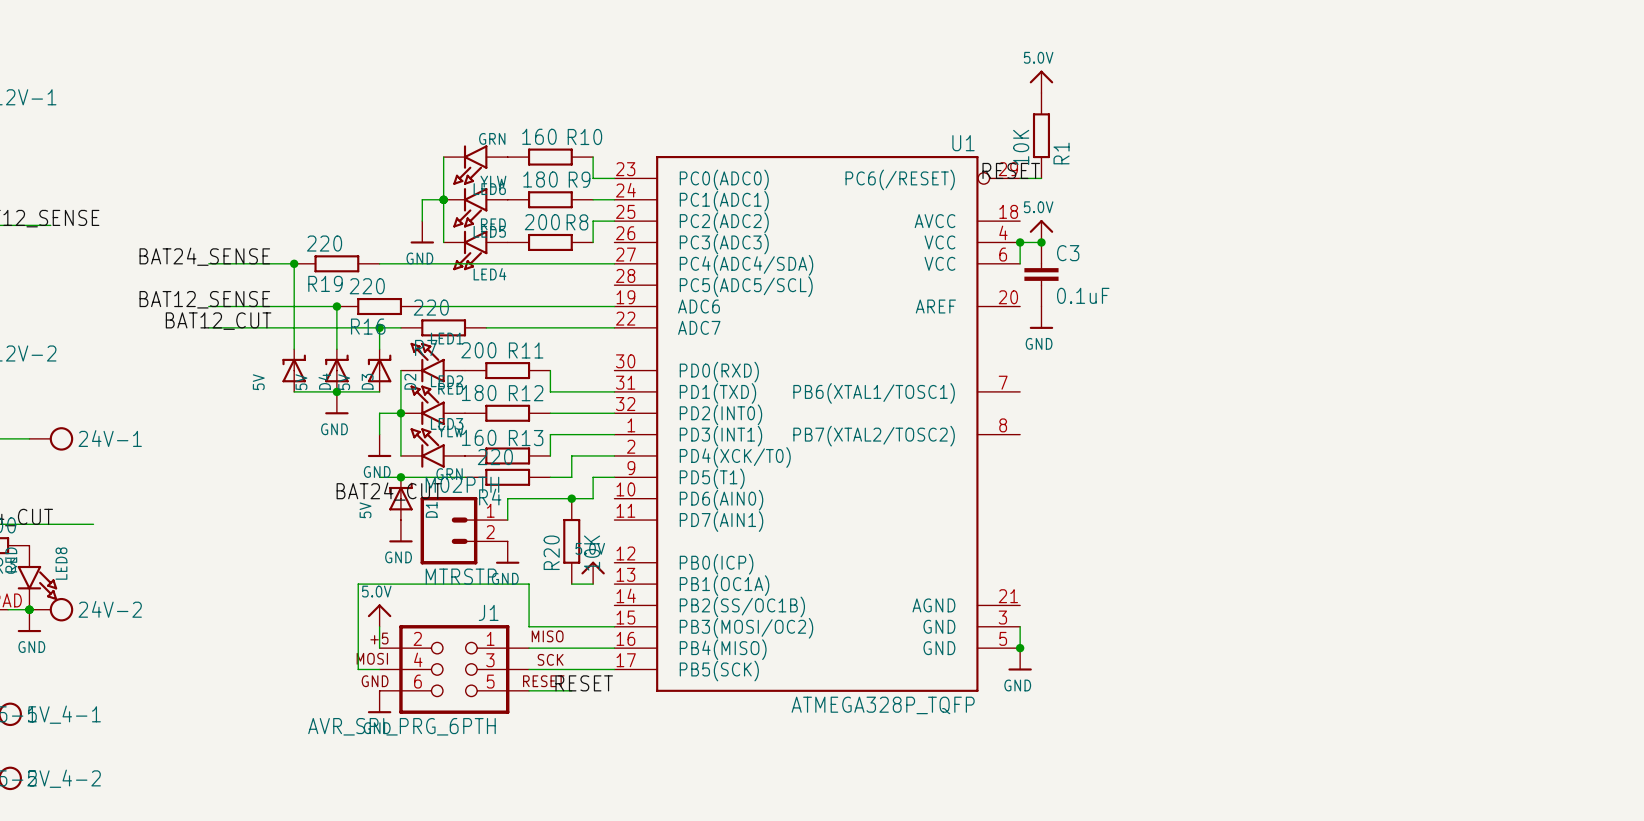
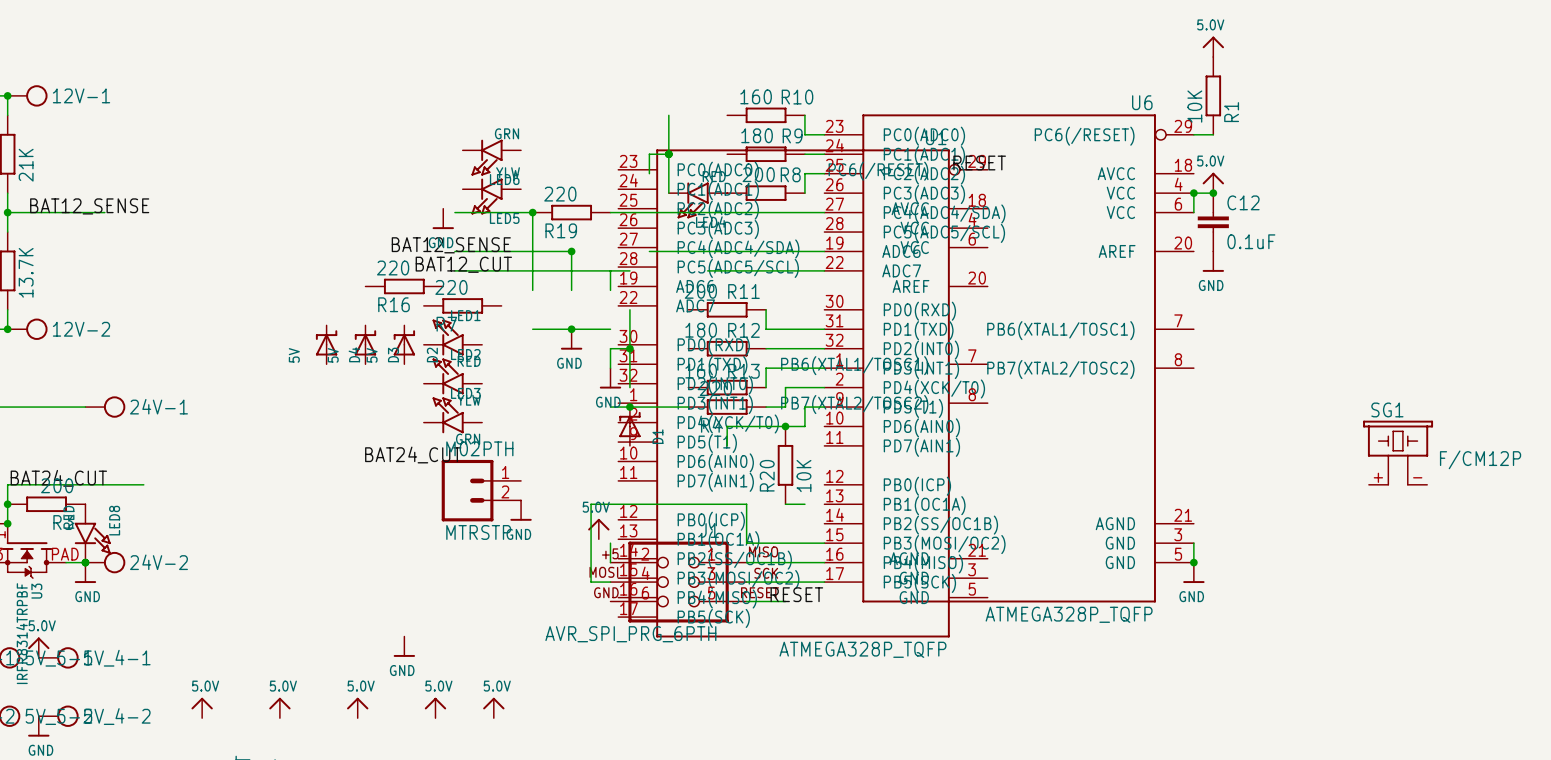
power symbol: none -> 5.0V (1213, 46)
power symbol: 5.0V (1041, 81) -> none
wire: none -> (668, 115) (668, 193)
wire: none -> (804, 115) (804, 134) (824, 134)
R1 position: (1041, 135) -> (1213, 95)
wire: none -> (1193, 134) (1213, 134)
wire: (443, 157) (443, 242) -> none
R10 position: (550, 157) -> (766, 115)
wire: (593, 157) (593, 178) (614, 178) -> none
junction: none -> (668, 154)
wire: (1020, 178) (1041, 178) -> (804, 154) (824, 154)
power symbol: none -> 5.0V (1213, 182)
wire: (443, 199) (422, 199) (422, 221) -> none
junction: (443, 199) -> none
R9 position: (550, 199) -> (766, 154)
wire: (593, 199) (614, 199) -> none
junction: none -> (1193, 193)
wire: none -> (1213, 193) (1193, 193) (1193, 212)
junction: none -> (1213, 193)
wire: (614, 221) (593, 221) (593, 242) -> (668, 154) (649, 154) (649, 173)
wire: none -> (454, 212) (532, 212) (532, 290)
junction: none -> (532, 212)
wire: none -> (610, 212) (824, 212)
power symbol: 5.0V (1041, 231) -> none
C12: none -> 0.1uF (1213, 222)
R8 position: (550, 242) -> (766, 193)
junction: (1020, 242) -> none
wire: (1041, 242) (1020, 242) (1020, 263) -> (824, 173) (804, 173) (804, 193)
junction: (1041, 242) -> none
LED4 position: (475, 250) -> (698, 200)
label: BAT24_SENSE (204, 256) -> none
label: none -> BAT12_SENSE (451, 245)
wire: (208, 263) (294, 263) (294, 349) -> none
junction: (294, 263) -> none
R19 position: (336, 263) -> (571, 212)
wire: (379, 263) (614, 263) -> none
wire: none -> (454, 251) (571, 251) (571, 290)
junction: none -> (571, 251)
wire: none -> (649, 251) (824, 251)
C3: 0.1uF (1041, 274) -> none
power symbol: none -> GND (1213, 261)
label: none -> BAT12_CUT (463, 264)
wire: none -> (610, 270) (610, 290)
wire: none -> (707, 270) (824, 270)
label: BAT12_SENSE (204, 299) -> none
wire: (208, 306) (336, 306) (336, 349) -> none
junction: (336, 306) -> none
wire: (422, 306) (614, 306) -> (454, 270) (629, 270)
power symbol: GND (1041, 317) -> none
label: BAT12_CUT (218, 321) -> none
wire: (208, 327) (400, 327) -> none
wire: (379, 327) (379, 349) -> none
junction: (379, 327) -> none
wire: (486, 327) (614, 327) -> none
wire: none -> (629, 309) (629, 387)
wire: none -> (766, 309) (766, 329) (824, 329)
junction: none -> (571, 329)
power symbol: none -> GND (571, 339)
wire: (400, 370) (400, 455) -> none
R11 position: (507, 370) -> (727, 309)
wire: (550, 370) (550, 391) (614, 391) -> none
wire: none -> (629, 348) (610, 348) (610, 368)
junction: none -> (629, 348)
wire: none -> (766, 348) (824, 348)
U6: none -> ATMEGA328P_TQFP (1009, 358)
wire: (294, 391) (379, 391) -> none
junction: (336, 391) -> none
wire: none -> (824, 368) (766, 368) (766, 387)
power symbol: GND (336, 403) -> none
power symbol: none -> GND (610, 378)
wire: (400, 413) (379, 413) (379, 434) -> none
junction: (400, 413) -> none
R12 position: (507, 413) -> (727, 348)
wire: (550, 413) (614, 413) -> none
wire: none -> (824, 387) (785, 387) (785, 407) (766, 407)
wire: (614, 434) (550, 434) (550, 455) -> none
wire: none -> (610, 407) (688, 407)
junction: none -> (629, 407)
wire: none -> (824, 407) (804, 407) (804, 426) (727, 426) (727, 445)
power symbol: GND (379, 445) -> none
R13 position: (507, 455) -> (727, 387)
wire: (614, 455) (571, 455) (571, 477) (550, 477) -> none
junction: none -> (785, 426)
wire: (379, 477) (465, 477) -> (532, 329) (610, 329)
junction: (400, 477) -> none
R4 position: (507, 477) -> (727, 407)
wire: (614, 477) (593, 477) (593, 498) (507, 498) (507, 520) -> none
SG1: none -> F/CM12P (1398, 453)
D1 position: (400, 498) -> (629, 426)
junction: (571, 498) -> none
D1 value: 5V (365, 510) -> none
power symbol: GND (400, 531) -> none
R20 position: (571, 541) -> (785, 465)
wire: none -> (785, 504) (804, 504)
wire: (571, 584) (593, 584) -> none
wire: none -> (610, 543) (610, 562)
wire: none -> (824, 543) (746, 543) (746, 504) (591, 504) (591, 582) (610, 582)
wire: none -> (1193, 543) (1193, 562)
wire: none -> (746, 562) (824, 562)
junction: none -> (1193, 562)
power symbol: 5.0V (379, 615) -> none
power symbol: none -> GND (1193, 572)
wire: (379, 626) (379, 648) -> none
wire: (614, 626) (529, 626) (529, 584) (358, 584) (358, 669) (379, 669) -> none
wire: (1020, 626) (1020, 648) -> none
wire: none -> (746, 582) (824, 582)
label: none -> RESET (796, 594)
wire: (529, 648) (614, 648) -> none
junction: (1020, 648) -> none
wire: none -> (746, 601) (785, 601)
power symbol: GND (1020, 659) -> none
J1 position: (454, 669) -> (678, 582)
wire: (529, 669) (614, 669) -> none
label: RESET (584, 683) -> none
wire: (529, 690) (571, 690) -> none
power symbol: none -> 5.0V (202, 707)
power symbol: none -> 5.0V (279, 707)
power symbol: none -> 5.0V (357, 707)
power symbol: none -> 5.0V (435, 707)
power symbol: none -> 5.0V (493, 707)

